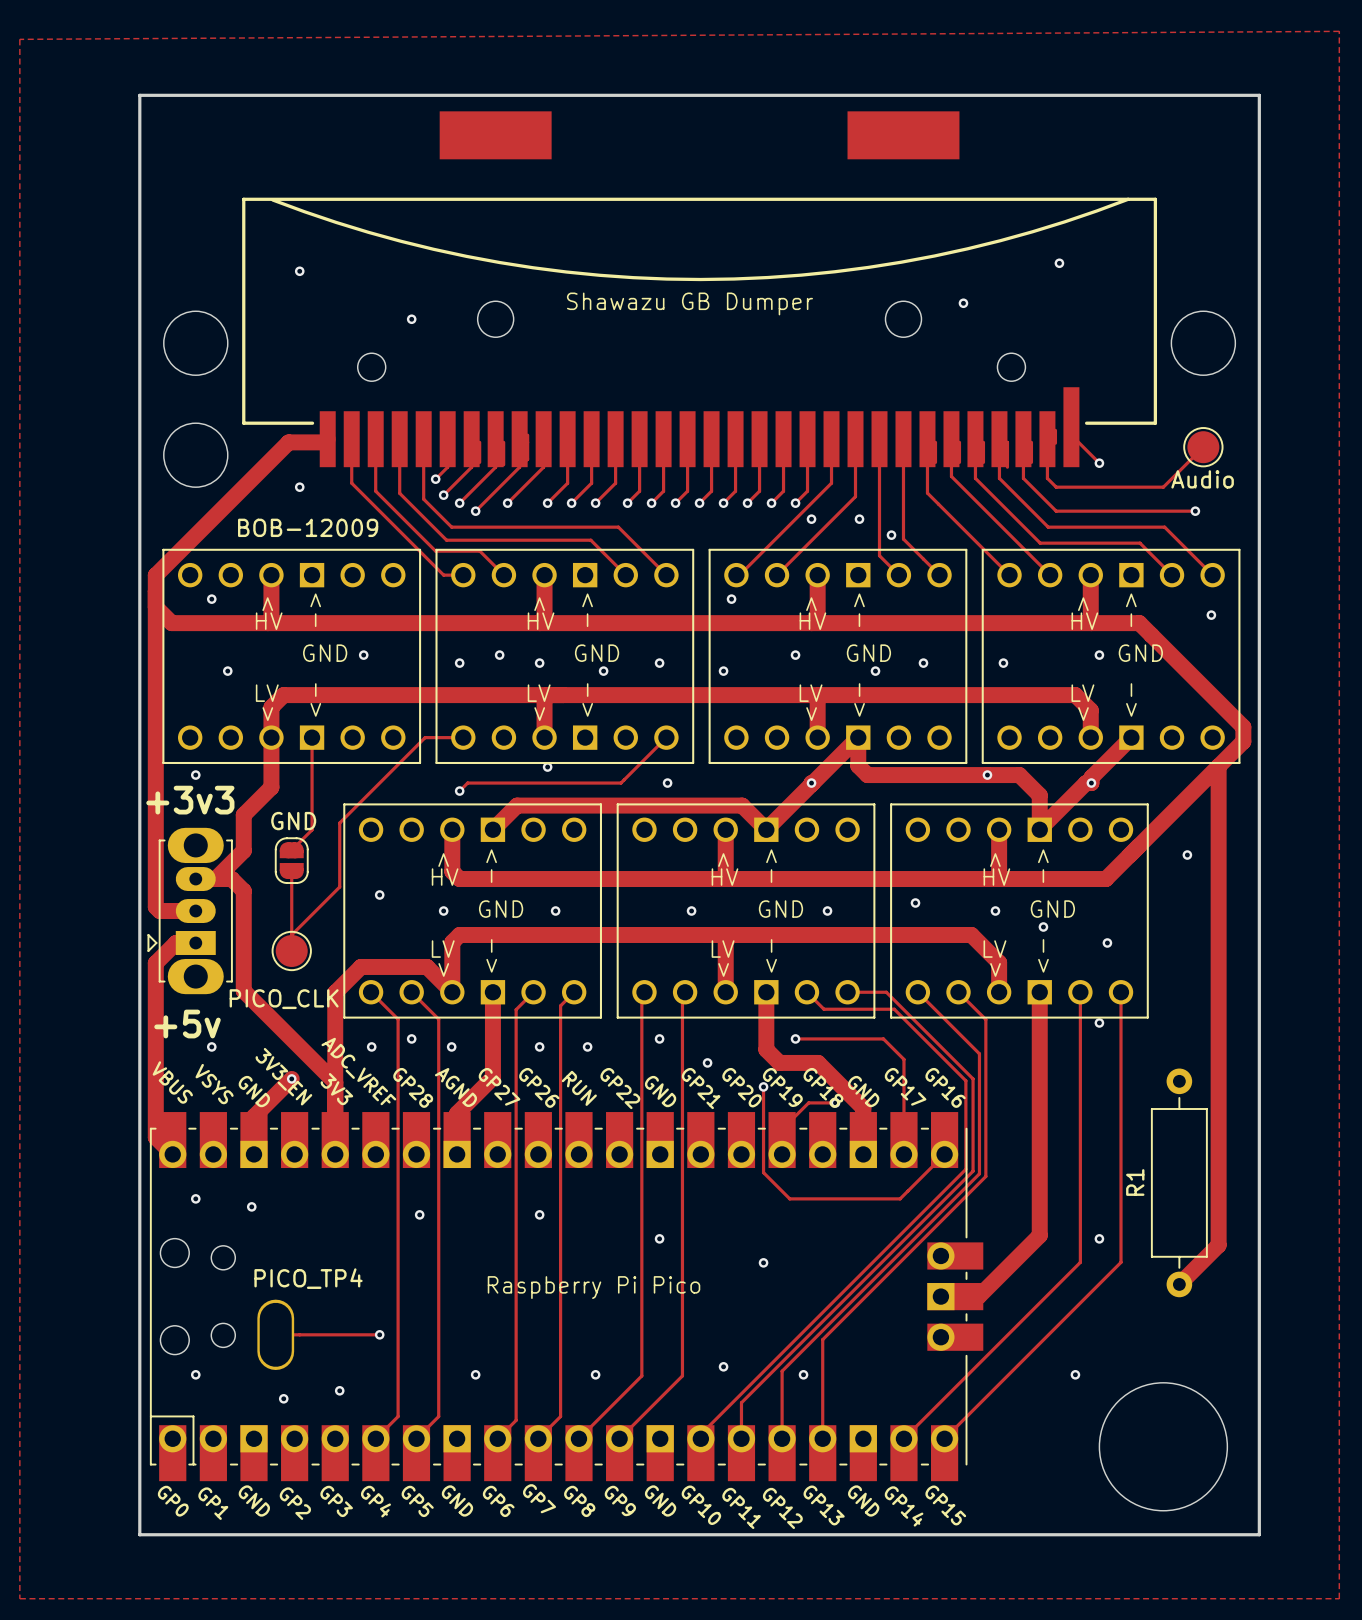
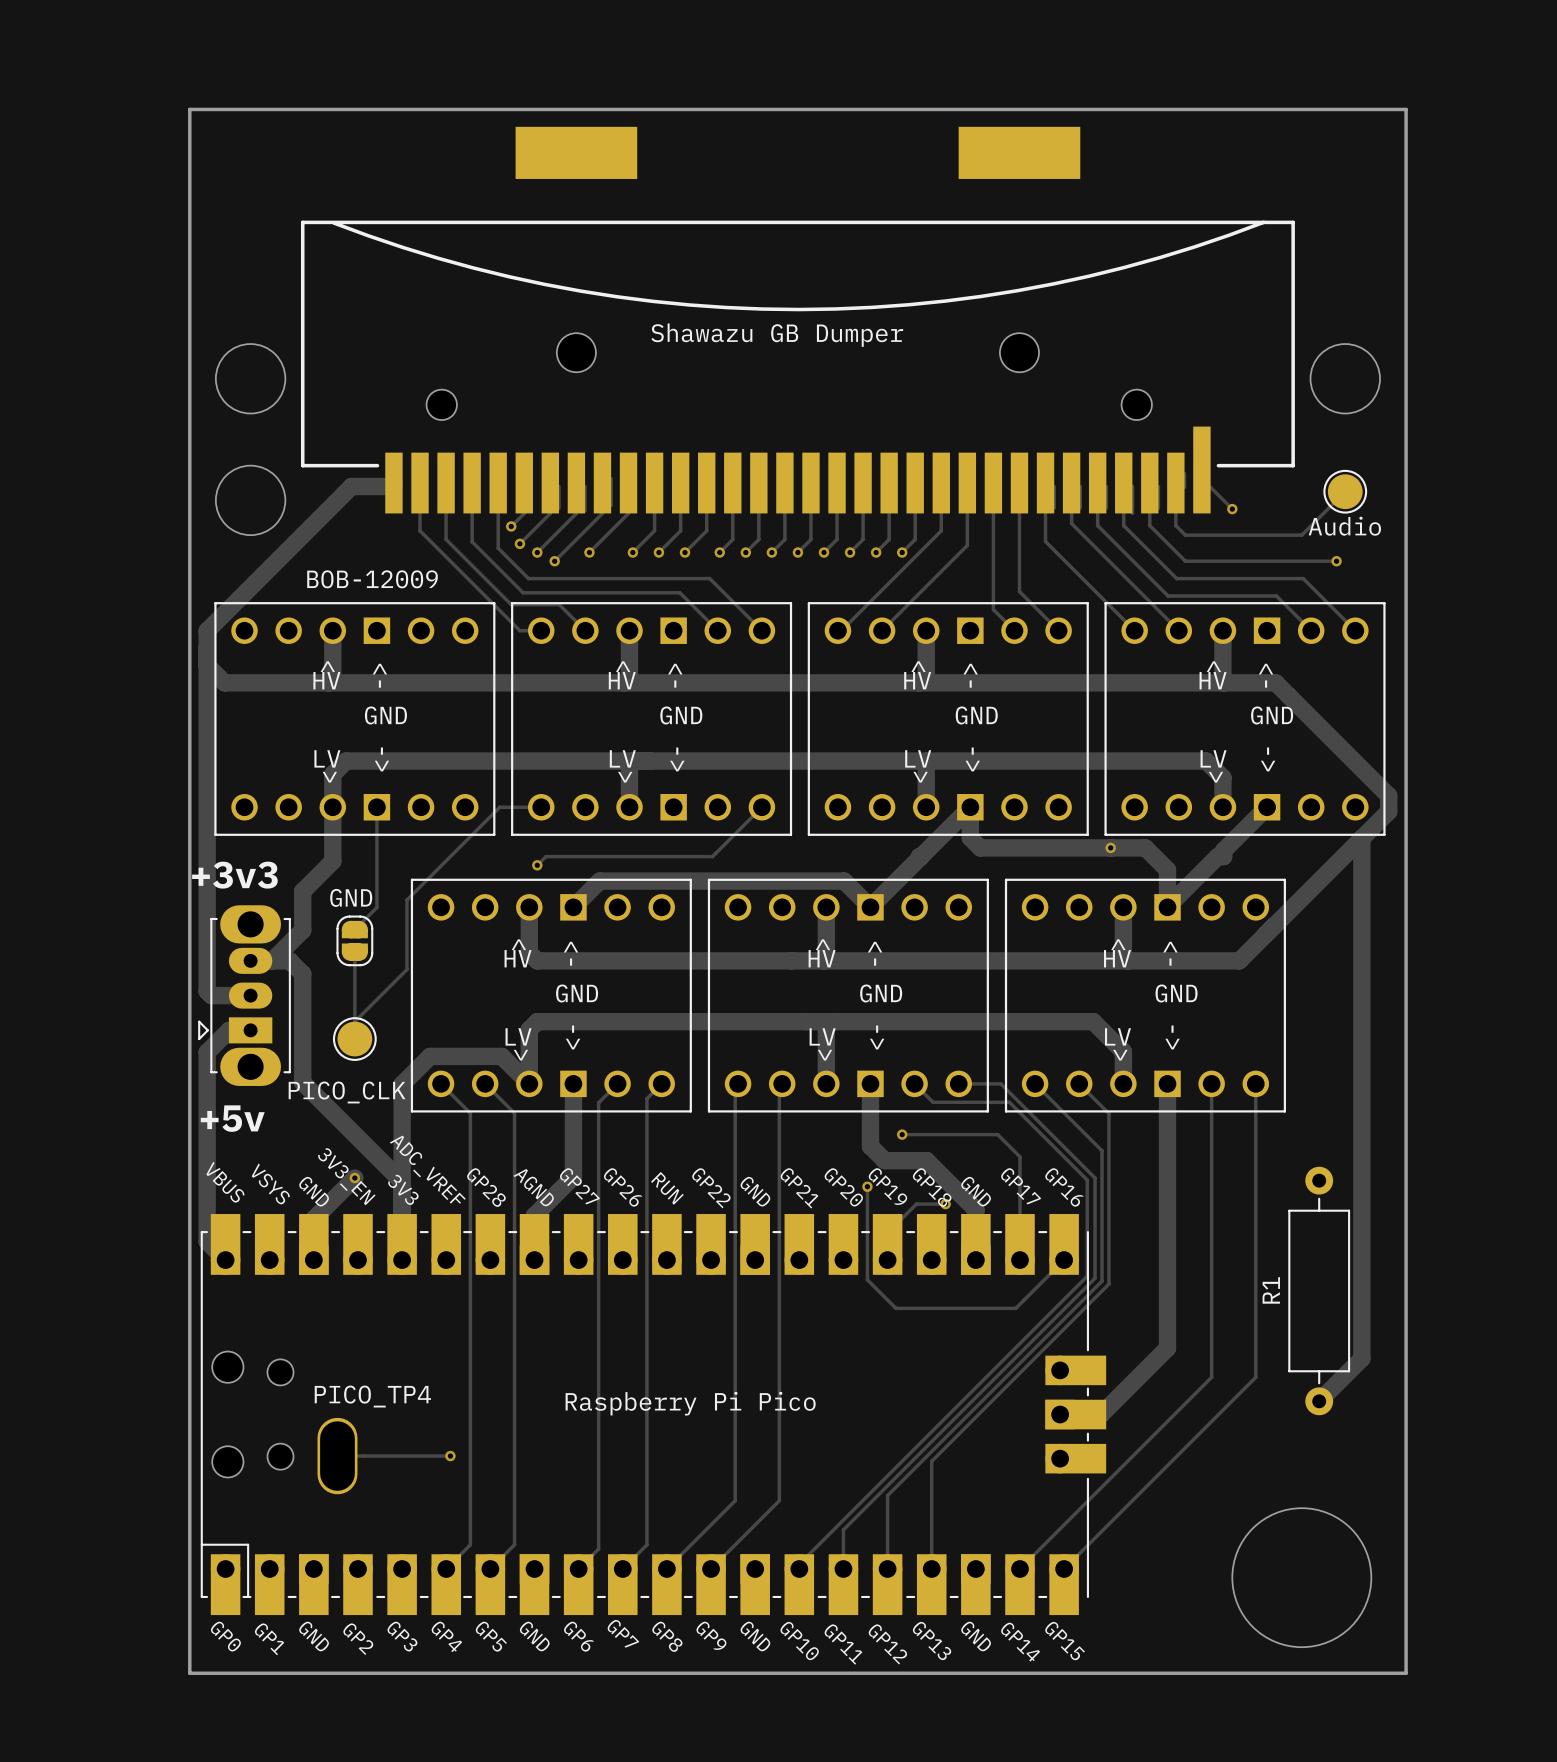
zone outline: (1339, 31) (1339, 1598) (19, 1598) (19, 39) (1339, 31) -> none
via: (1059, 263) -> none
via: (299, 271) -> none
via: (963, 303) -> none
via: (411, 319) -> none
via: (299, 487) -> none
via: (811, 519) -> none
via: (859, 519) -> none
via: (891, 535) -> none
via: (211, 599) -> none
via: (731, 599) -> none
via: (1211, 615) -> none
via: (363, 655) -> none
via: (499, 655) -> none
via: (795, 655) -> none
via: (1099, 655) -> none
via: (459, 663) -> none
via: (539, 663) -> none
via: (659, 663) -> none
via: (923, 663) -> none
via: (1003, 663) -> none
via: (227, 671) -> none
via: (603, 671) -> none
via: (723, 671) -> none
via: (875, 671) -> none
via: (547, 767) -> none
via: (195, 775) -> none
via: (667, 783) -> none
via: (811, 783) -> none
via: (1091, 783) -> none
via: (1187, 855) -> none
via: (379, 895) -> none
via: (915, 903) -> none
via: (443, 911) -> none
via: (555, 911) -> none
via: (691, 911) -> none
via: (827, 911) -> none
via: (995, 911) -> none
via: (1043, 926) -> none
via: (1107, 942) -> none
via: (1099, 1022) -> none
via: (411, 1038) -> none
via: (659, 1038) -> none
via: (211, 1046) -> none
via: (371, 1046) -> none
via: (451, 1046) -> none
via: (539, 1046) -> none
via: (587, 1046) -> none
via: (707, 1062) -> none
via: (195, 1198) -> none
via: (251, 1206) -> none
via: (419, 1214) -> none
via: (539, 1214) -> none
via: (659, 1238) -> none
via: (1099, 1238) -> none
via: (763, 1262) -> none
via: (723, 1366) -> none
via: (195, 1374) -> none
via: (475, 1374) -> none
via: (595, 1374) -> none
via: (803, 1374) -> none
via: (1075, 1374) -> none
via: (339, 1390) -> none
via: (283, 1398) -> none

